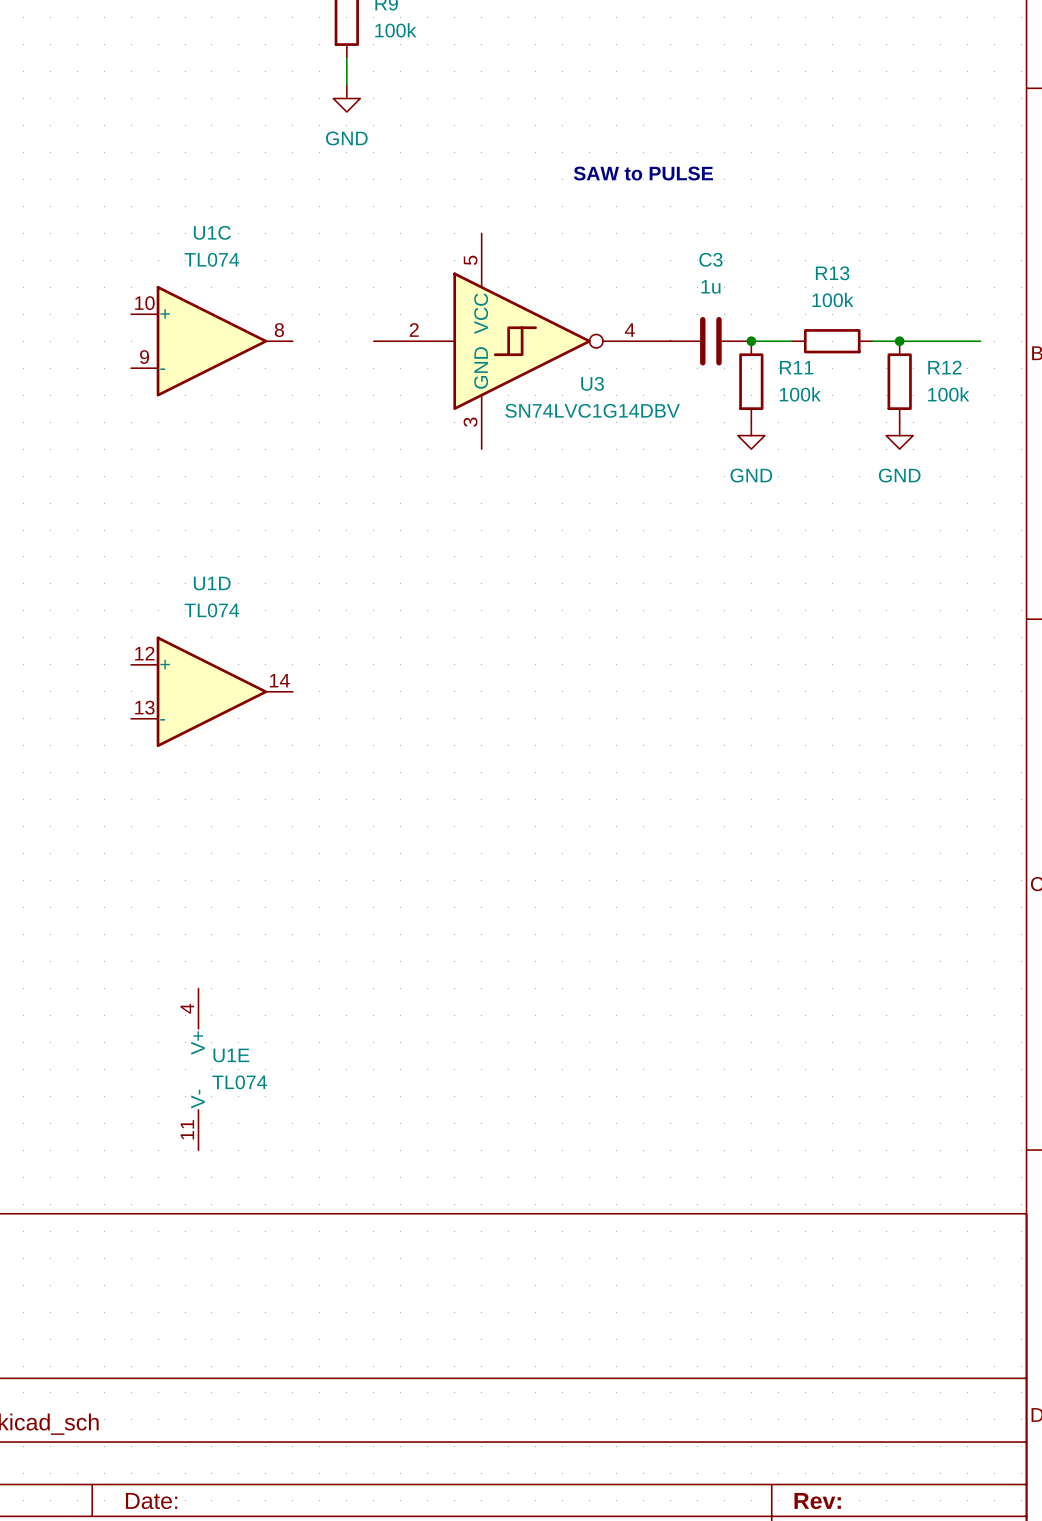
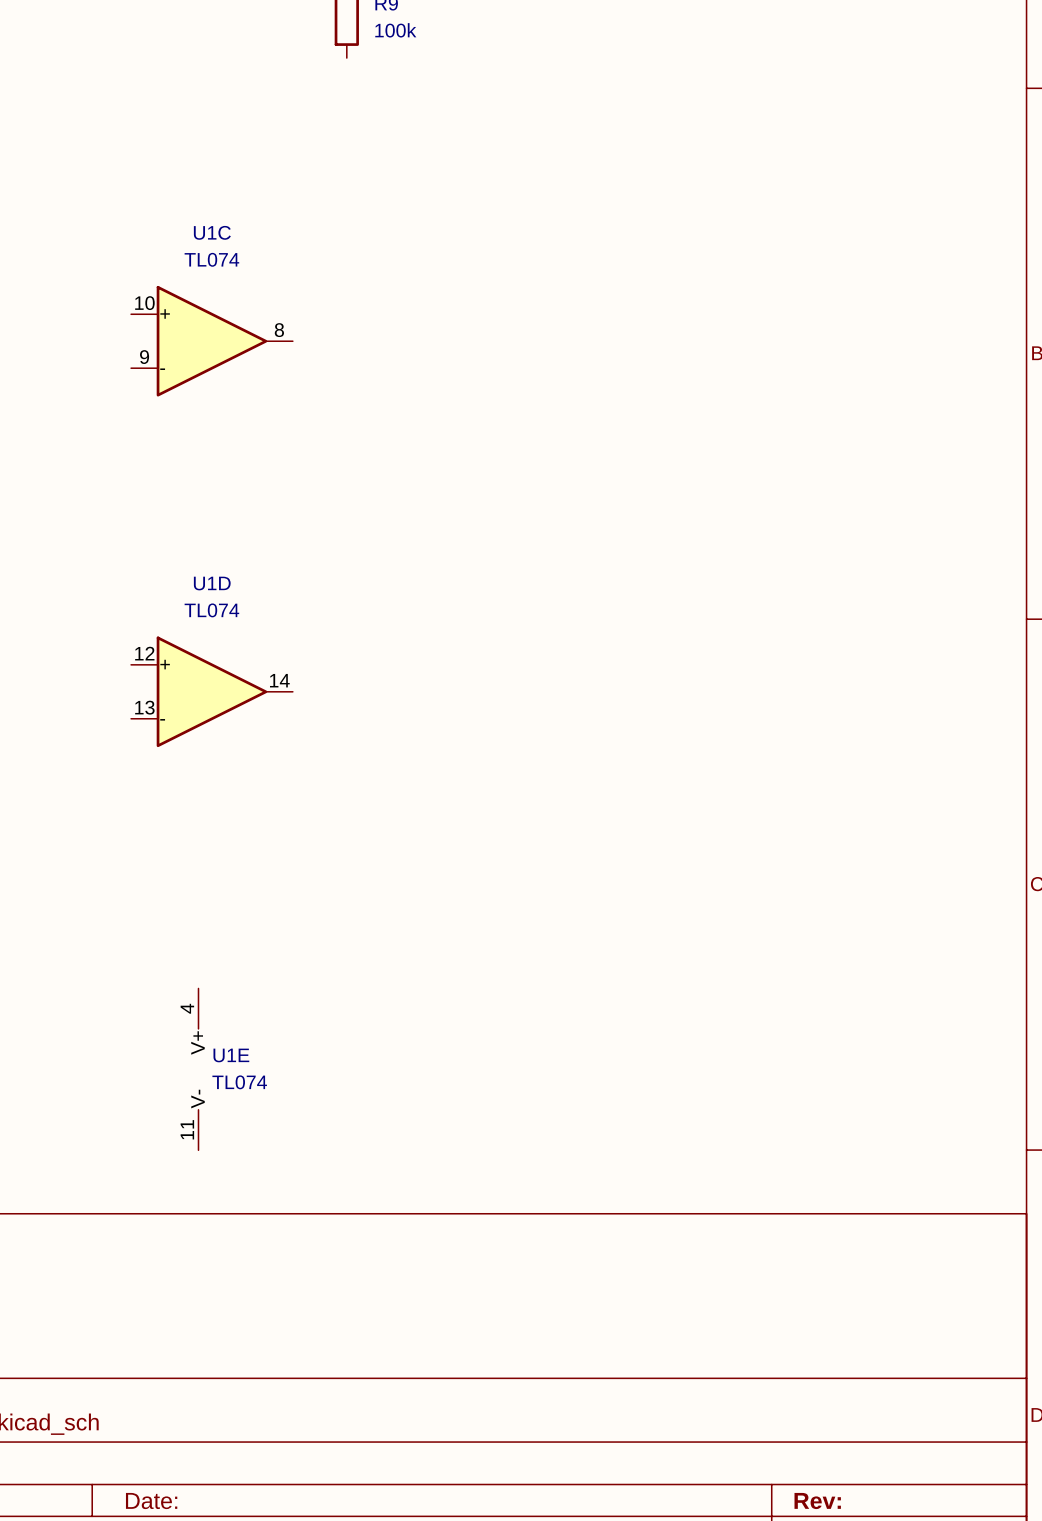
wire: (346, 58) (346, 85) -> none
power symbol: GND (346, 98) -> none
text: SAW to PULSE (643, 173) -> none
U3: SN74LVC1G14DBV (522, 341) -> none
C3: 1u (710, 341) -> none
wire: (751, 341) (791, 341) -> none
junction: (751, 341) -> none
R13: 100k (832, 341) -> none
wire: (872, 341) (980, 341) -> none
junction: (899, 341) -> none
R11: 100k (751, 381) -> none
R12: 100k (899, 381) -> none
power symbol: GND (751, 435) -> none
power symbol: GND (899, 435) -> none

